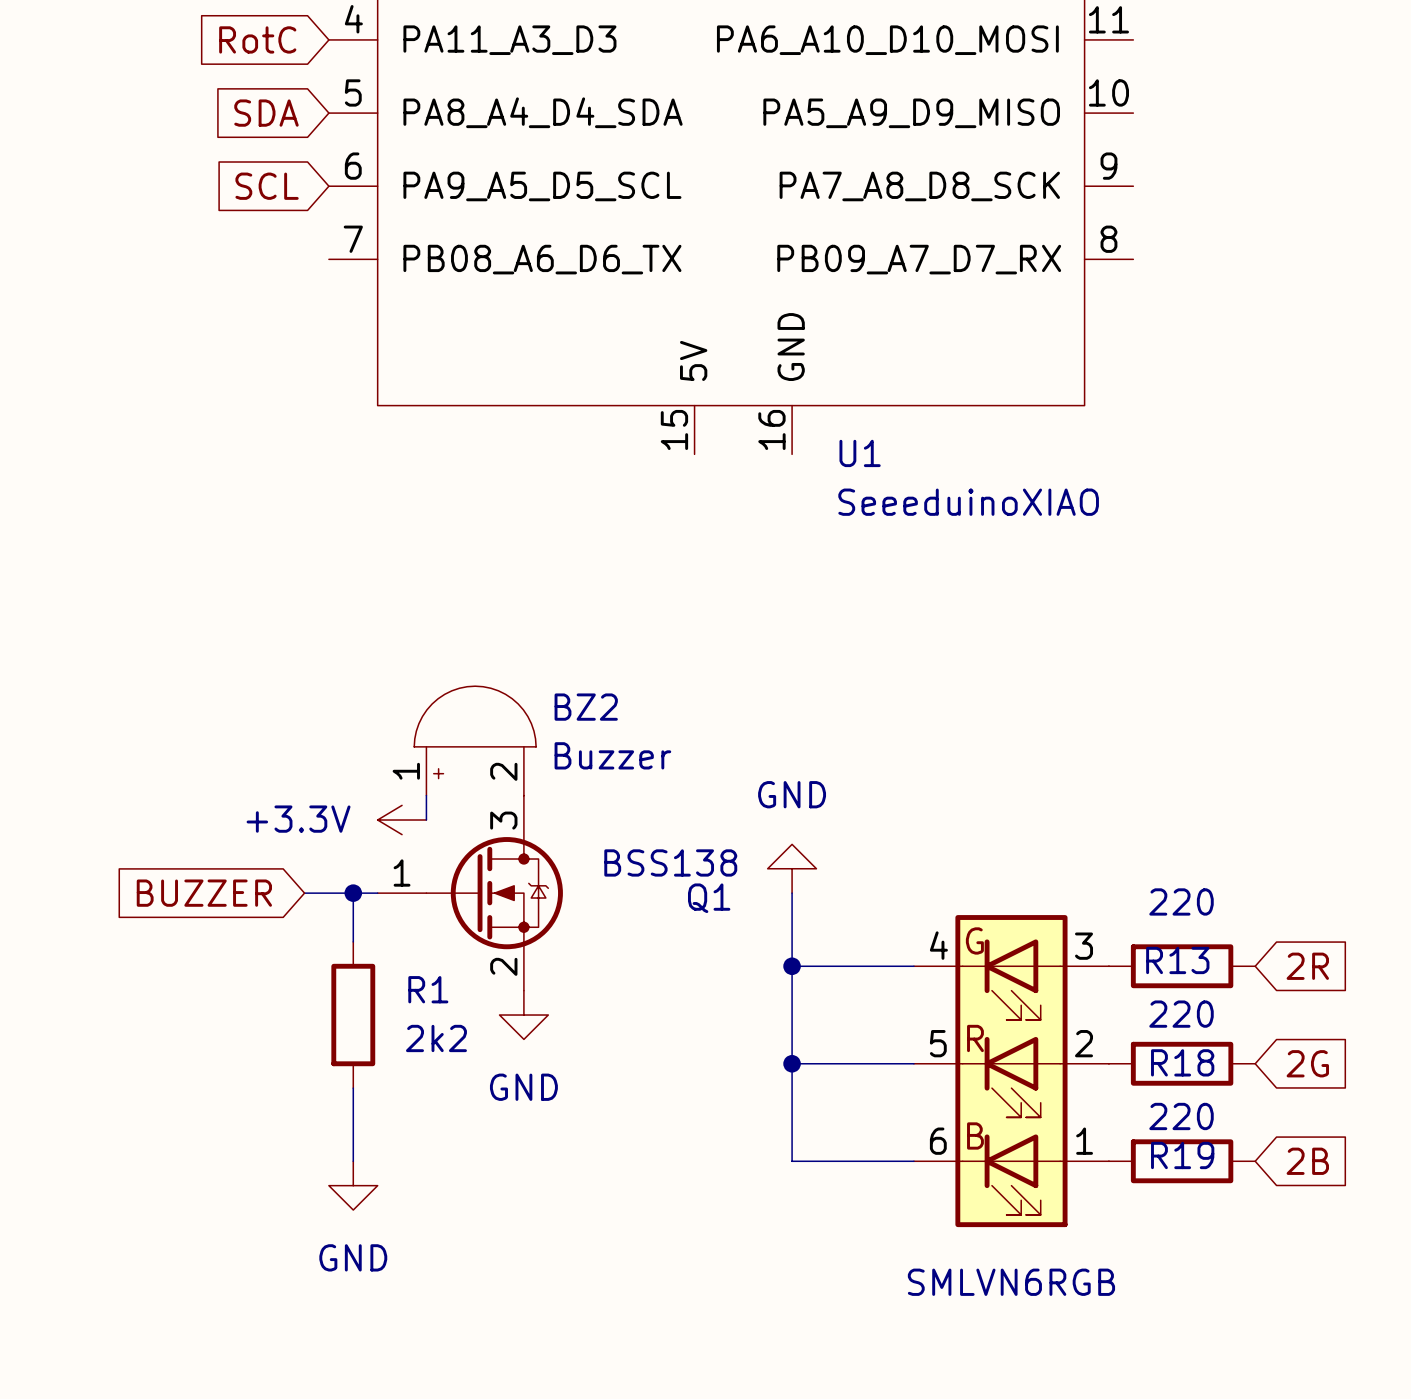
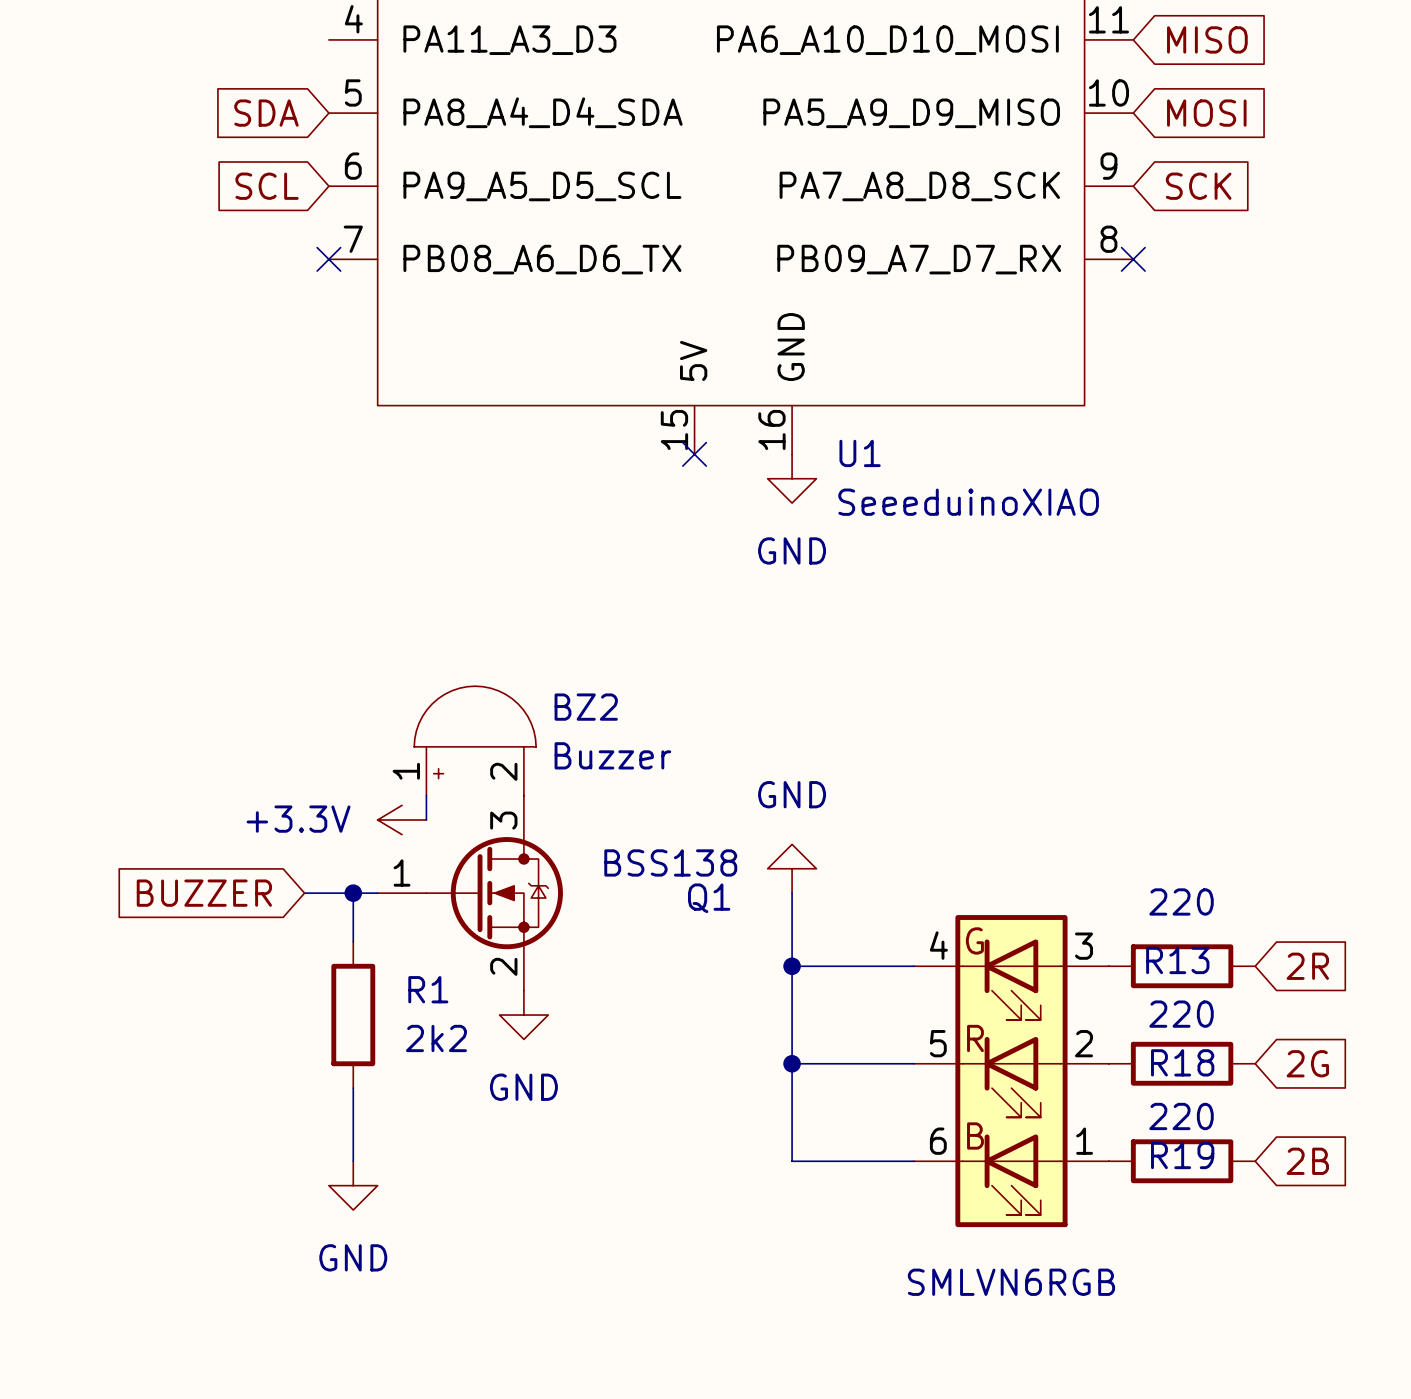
global label: RotC (257, 39) -> none
global label: none -> MISO (1207, 39)
global label: none -> MOSI (1206, 113)
global label: none -> SCK (1198, 186)
no-connect mark: none -> (328, 259)
no-connect mark: none -> (1133, 259)
no-connect mark: none -> (694, 454)
power symbol: none -> GND (792, 478)

